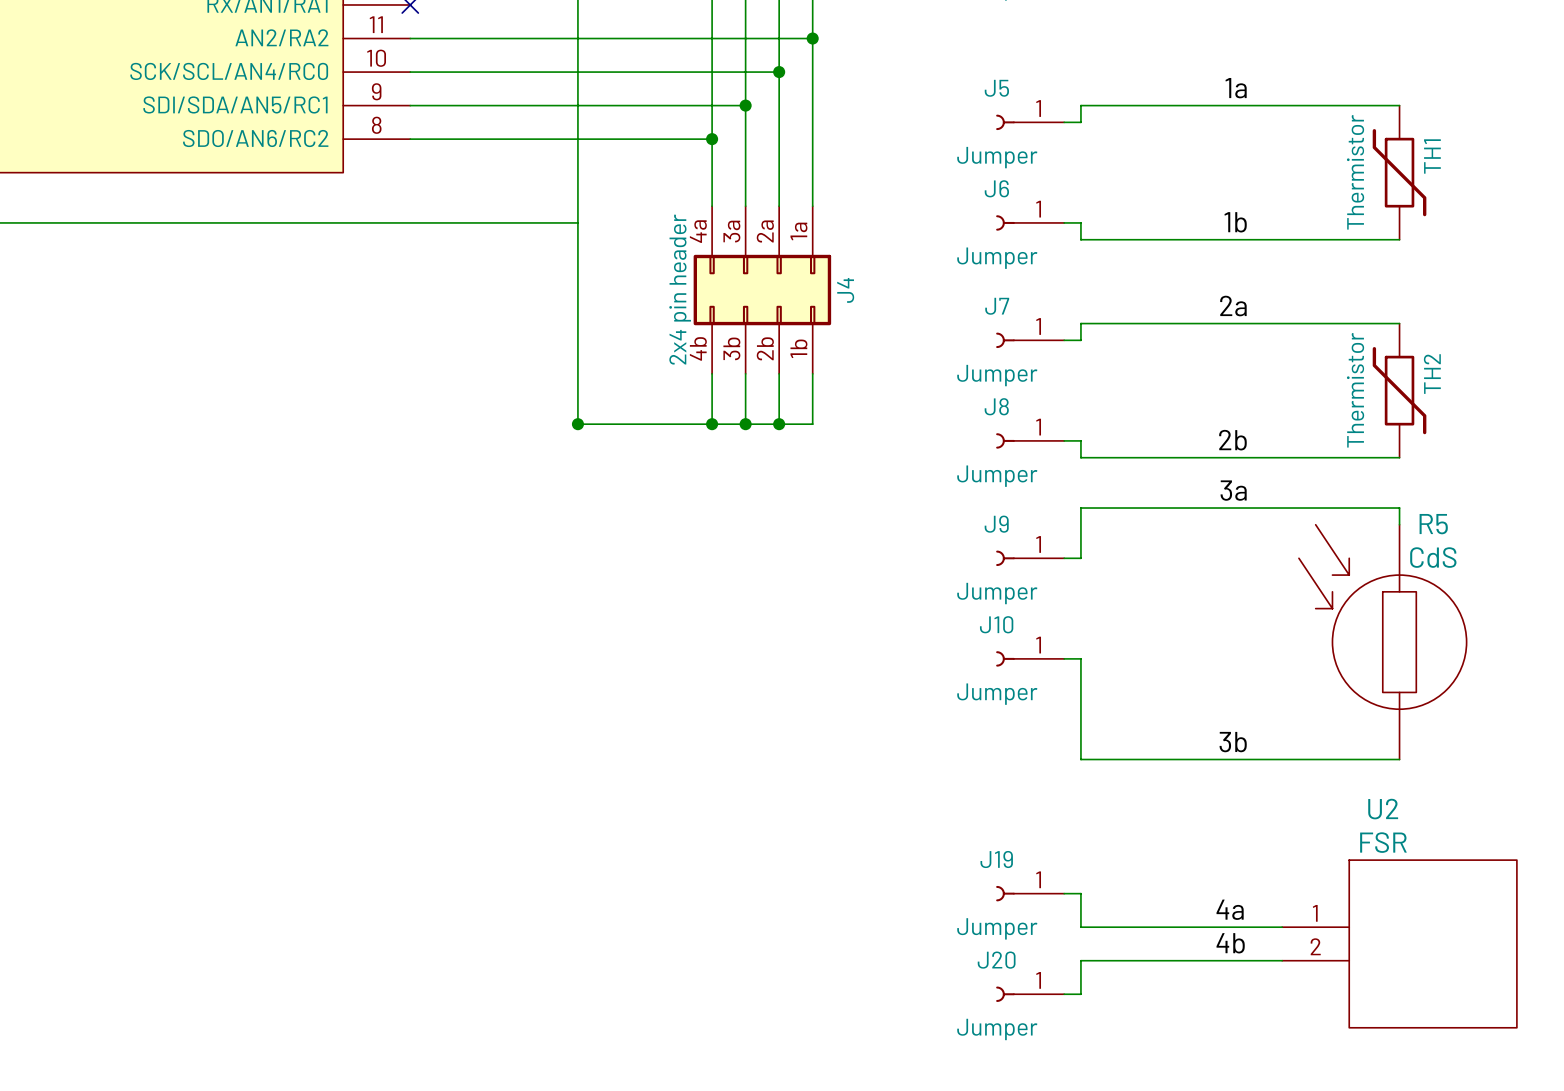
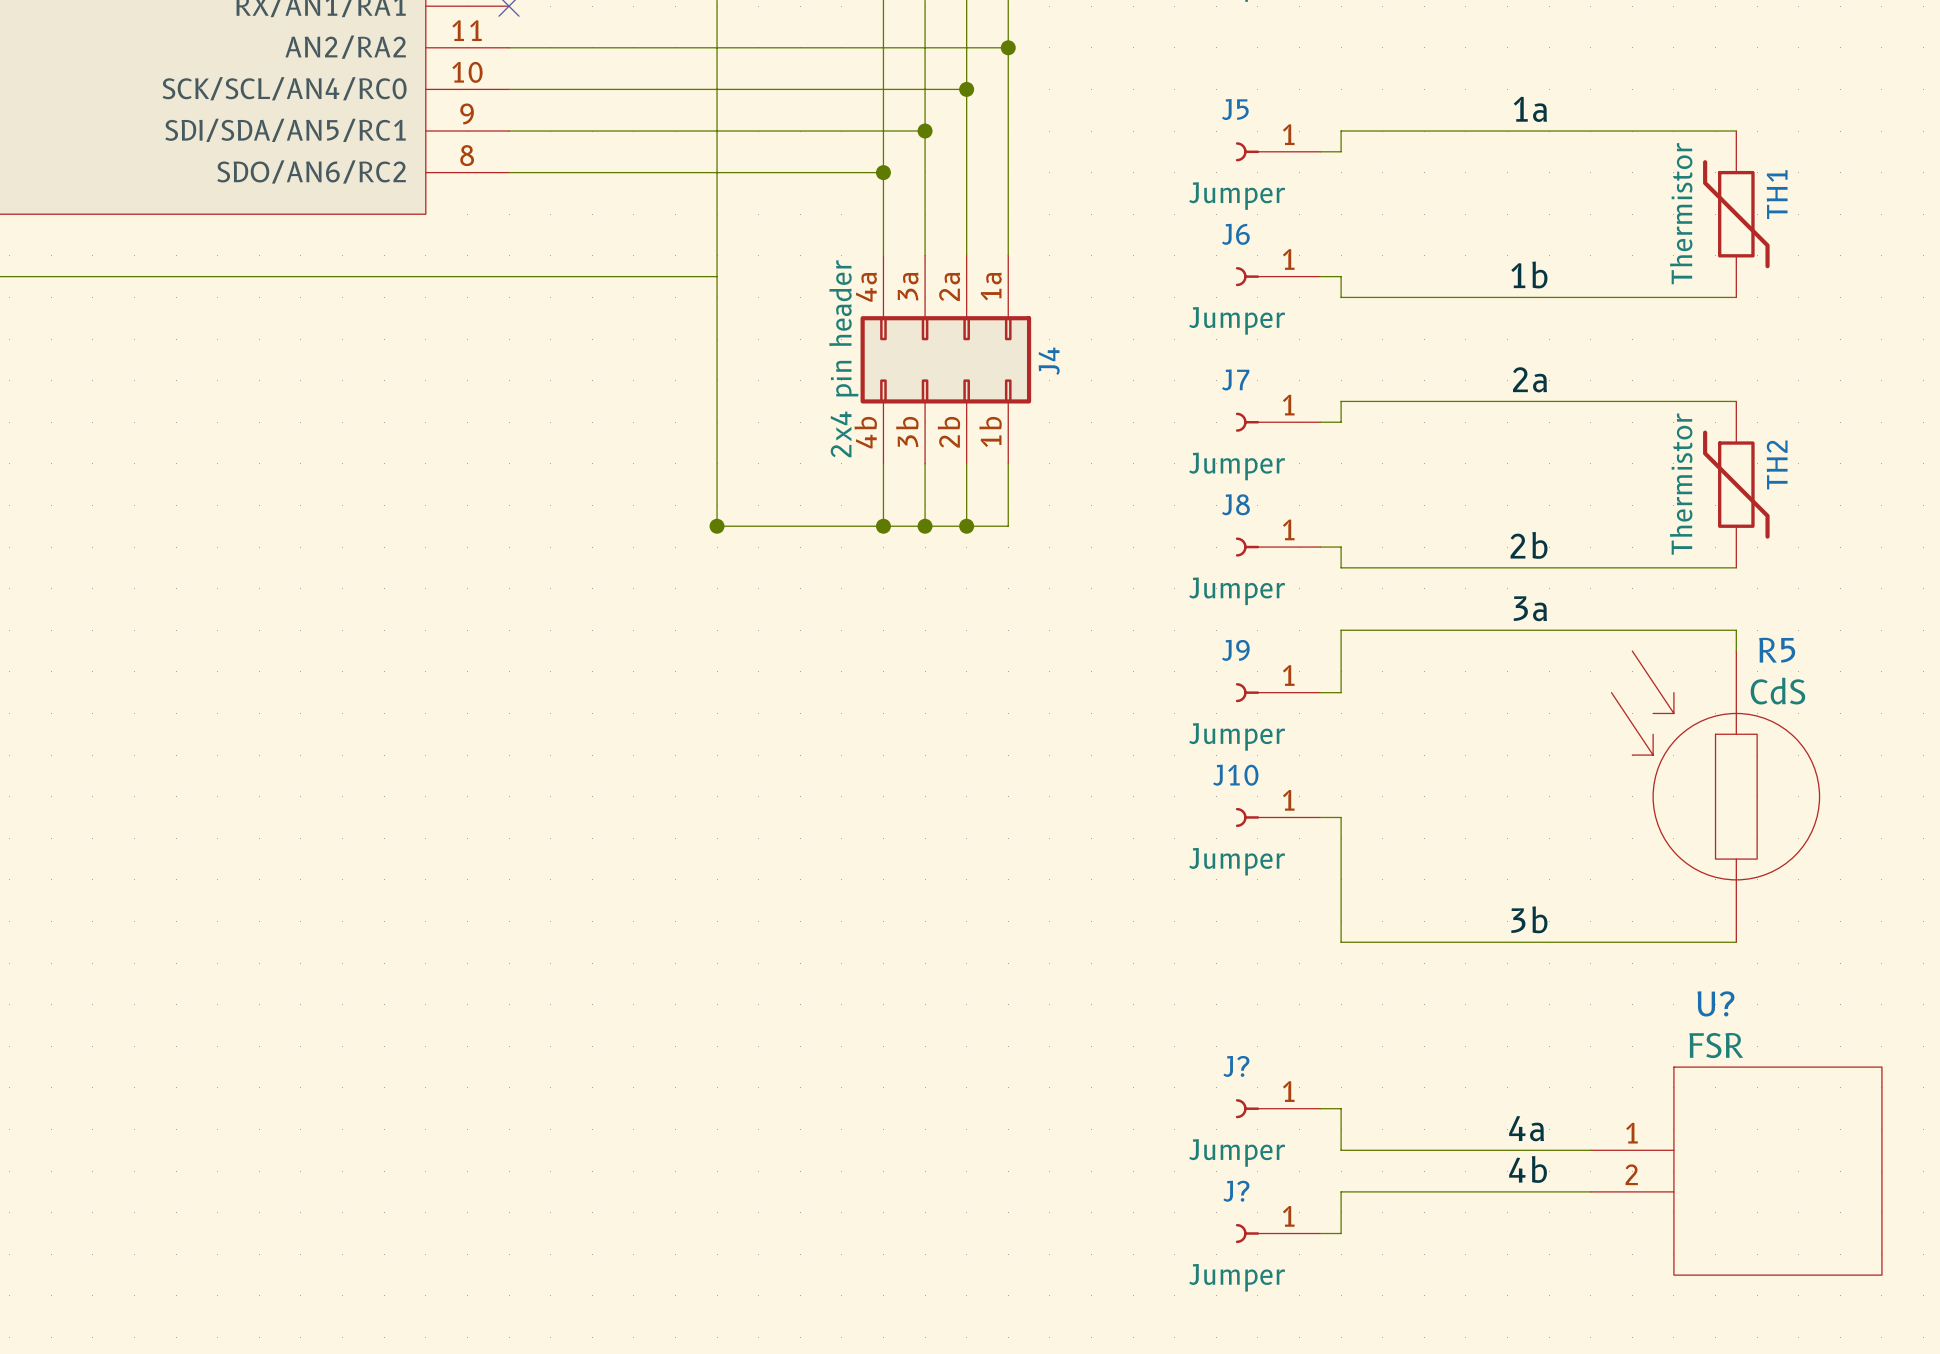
U2 name: U2 (1383, 809) -> U? (1715, 1003)
J19 name: J19 (996, 859) -> J? (1236, 1066)
J20 name: J20 (996, 960) -> J? (1236, 1191)

